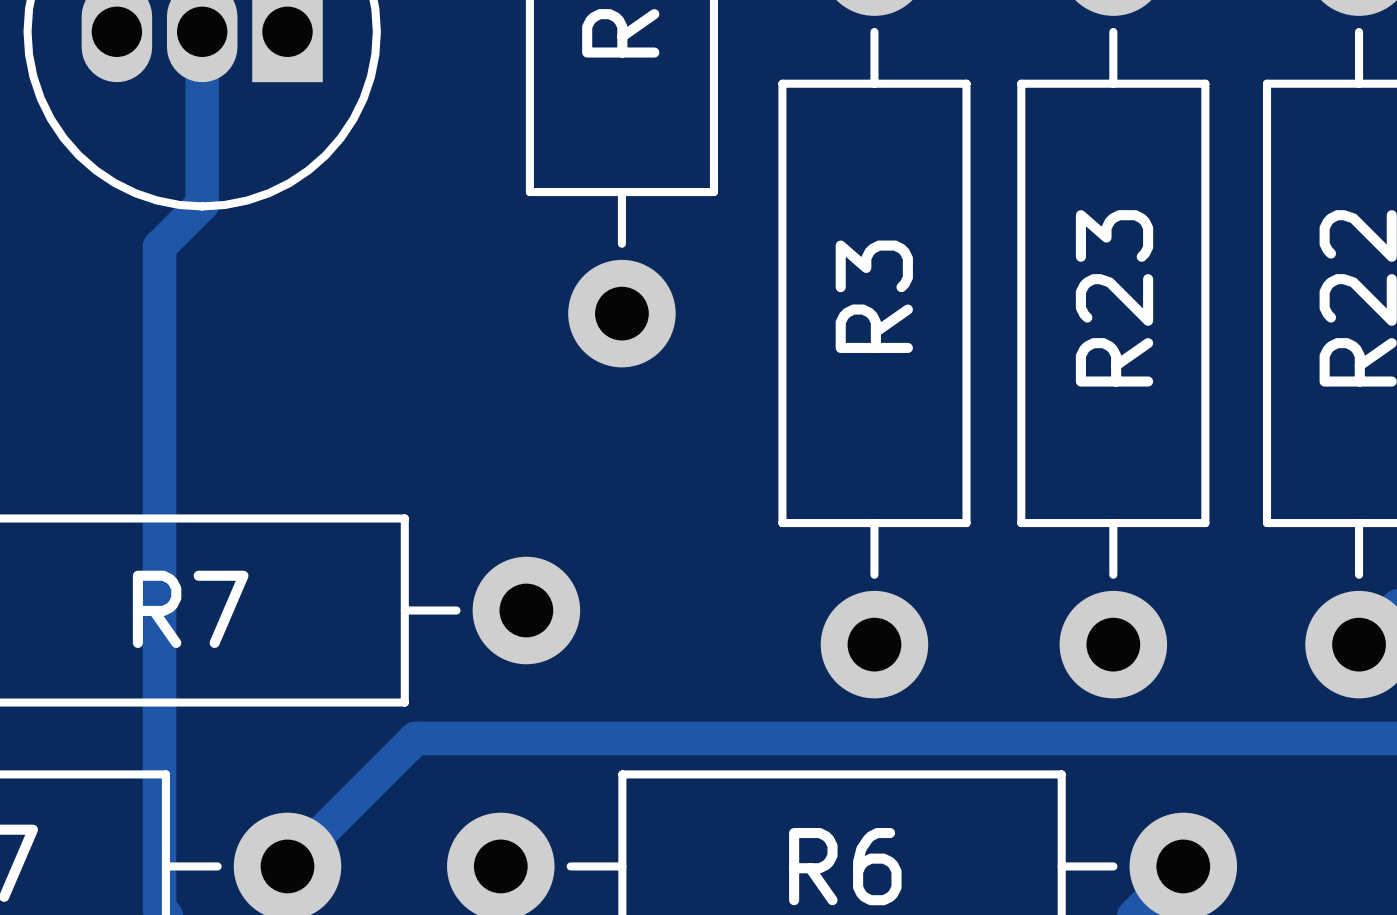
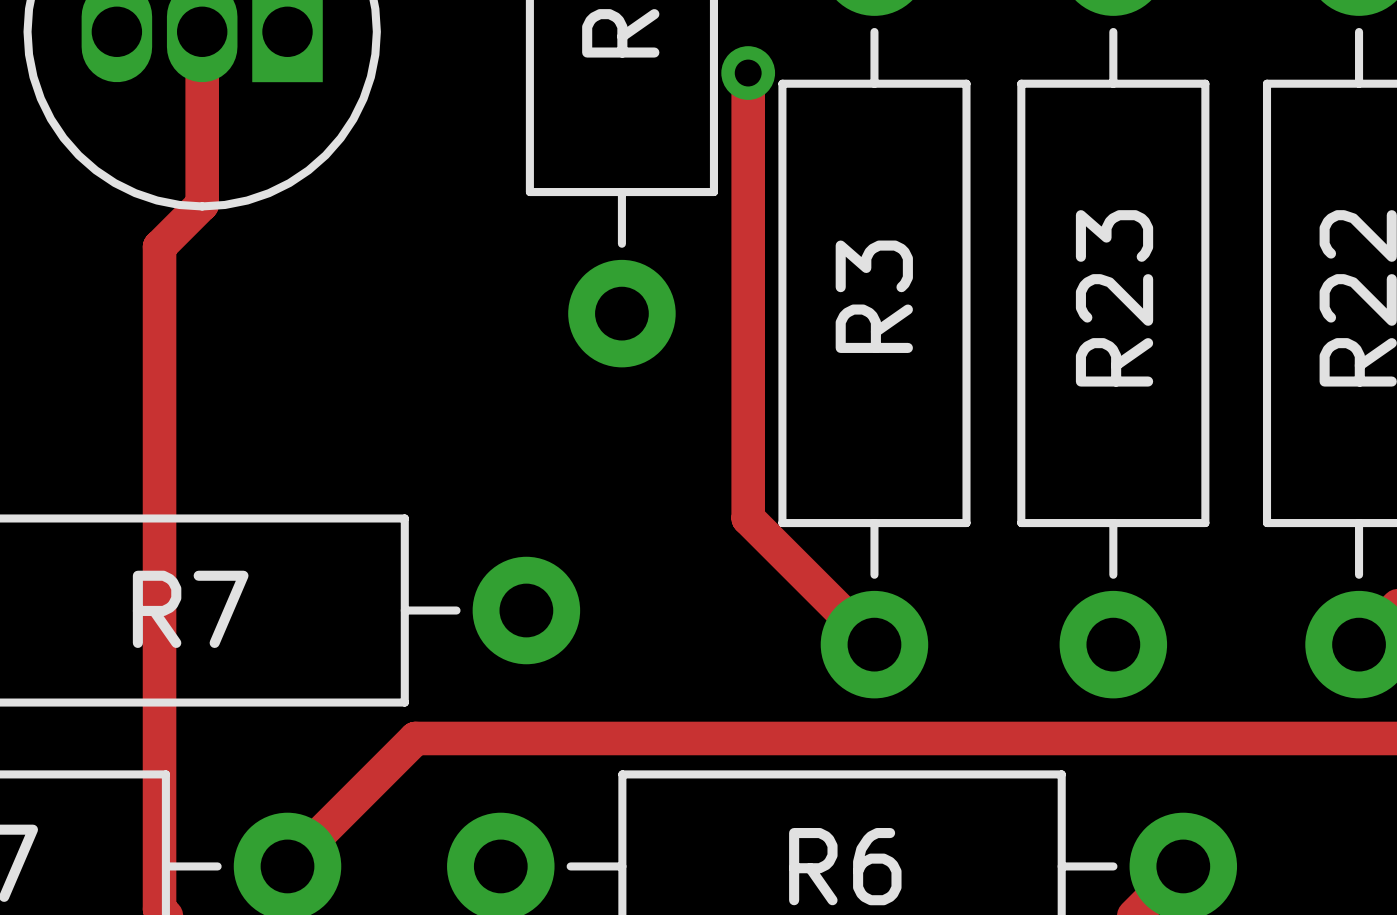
track: none -> (748, 73) (748, 518) (874, 644)
via: none -> (748, 73)

